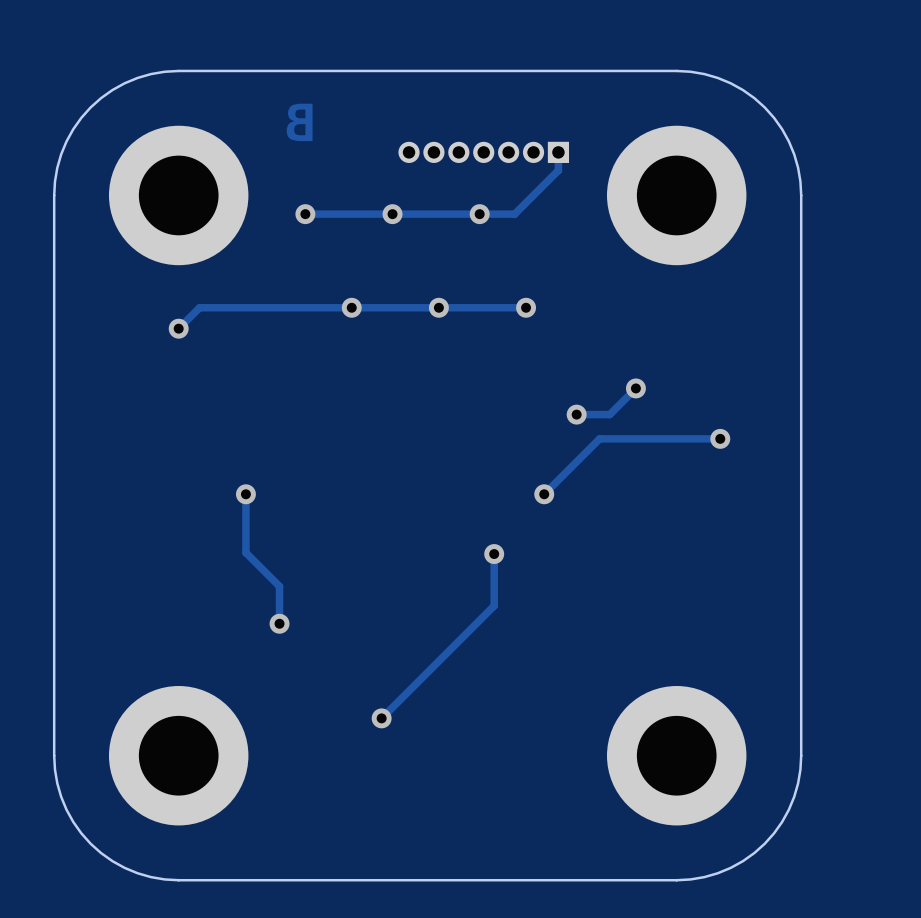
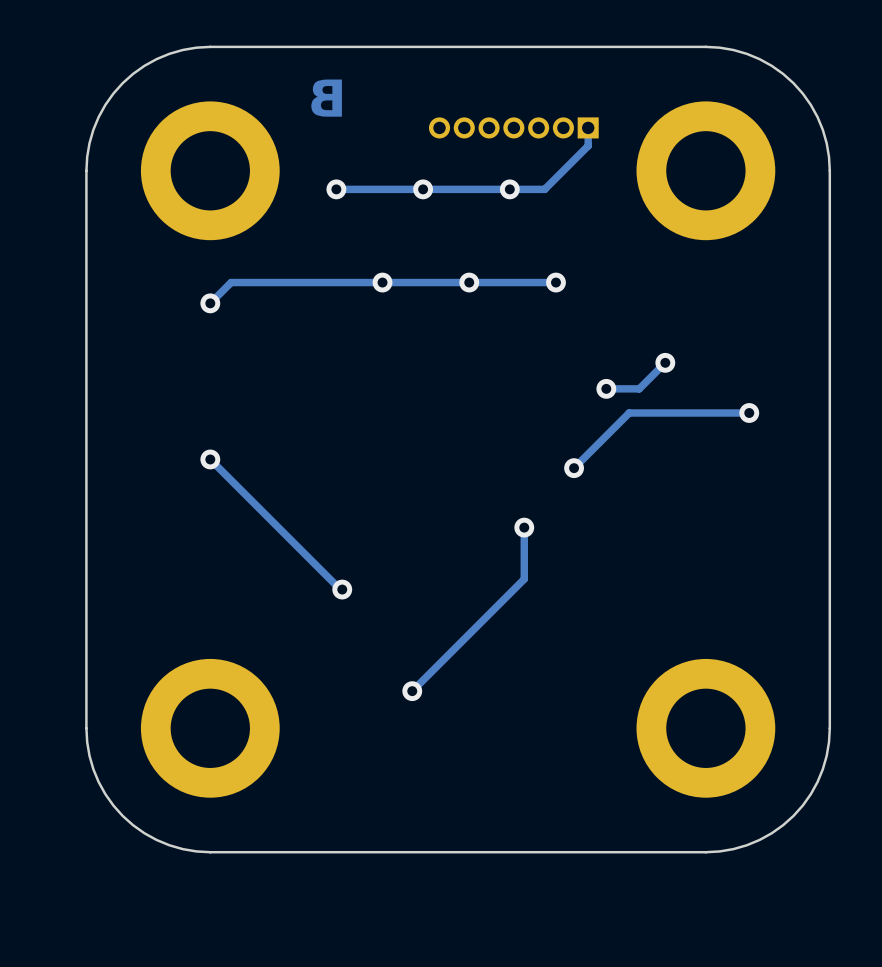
track: (245, 494) (245, 552) -> (210, 459) (277, 526)
via position: (245, 494) -> (210, 459)
track: (279, 586) (279, 623) -> (310, 559) (342, 589)
via position: (279, 623) -> (342, 589)

